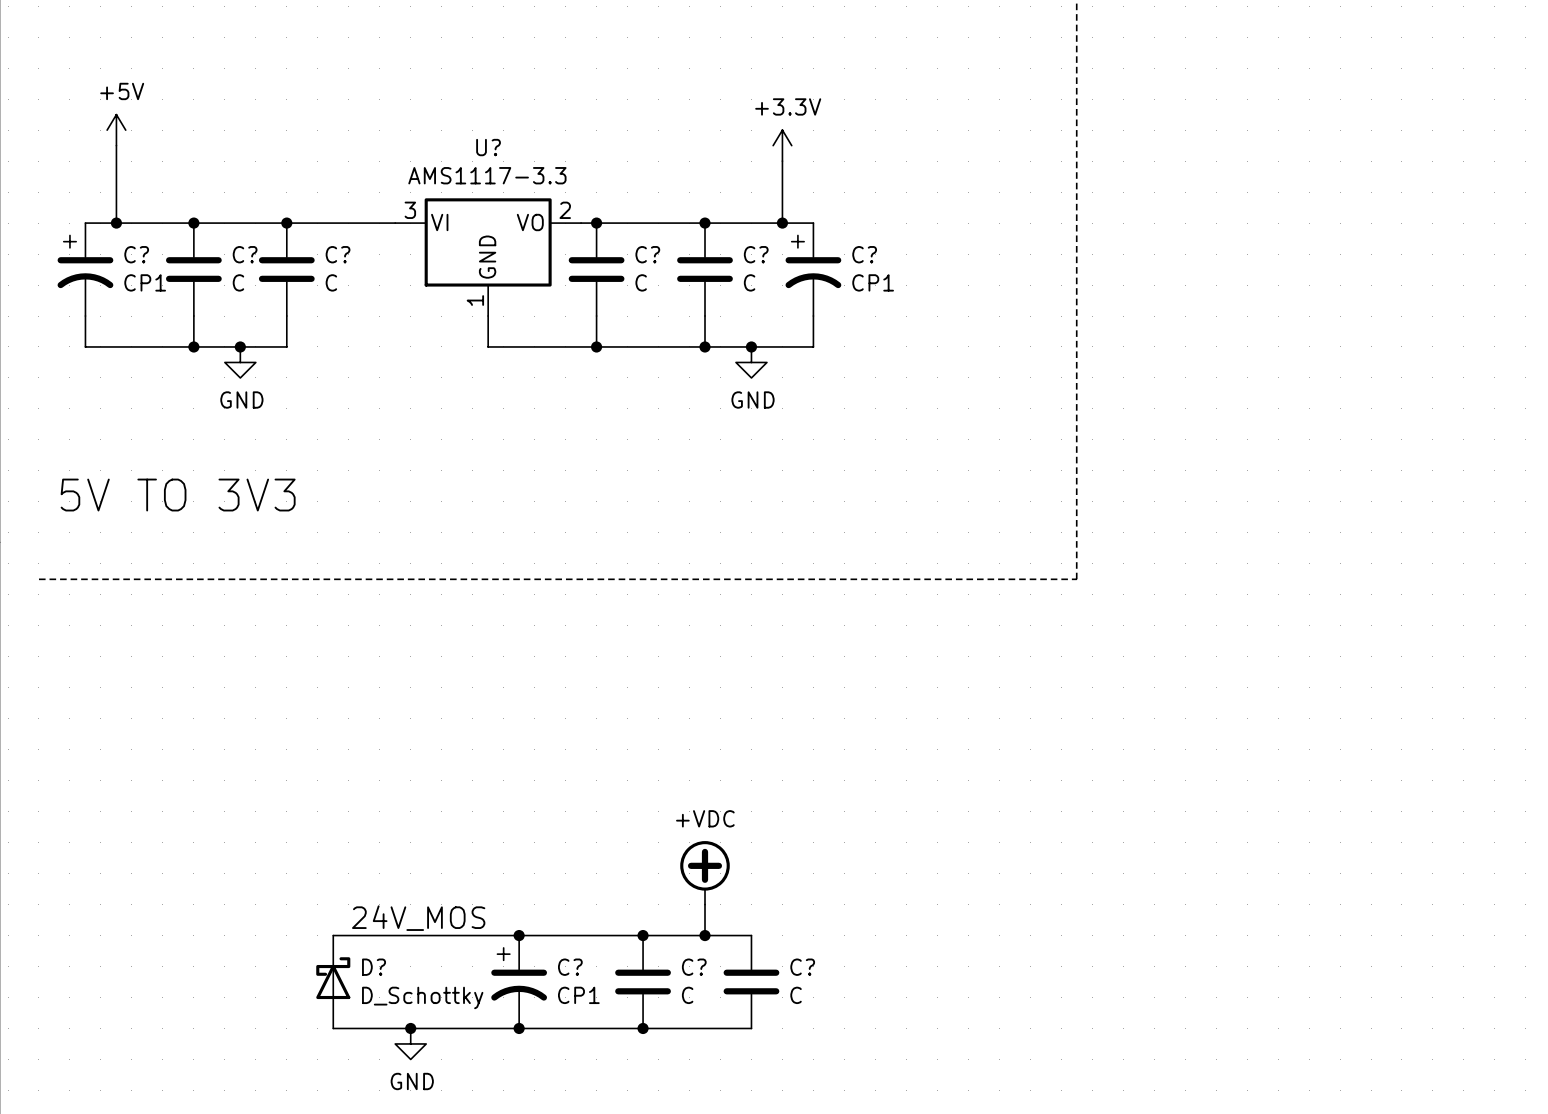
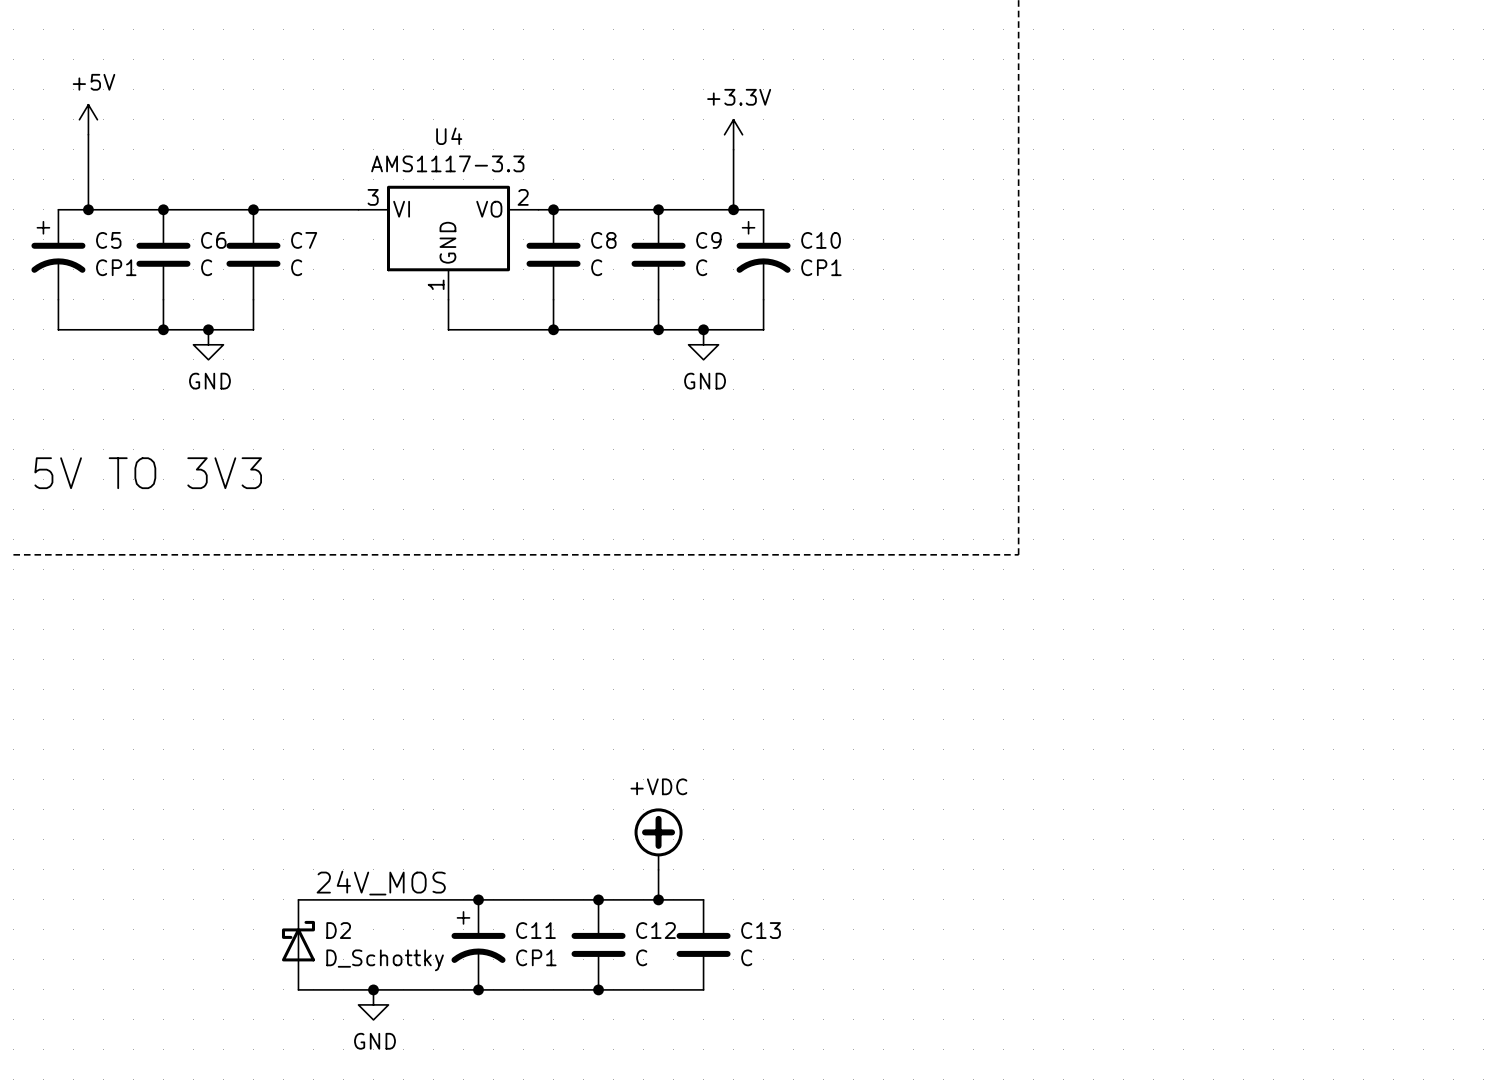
U? name: U? (488, 147) -> U4 (449, 136)
C? name: C? (136, 254) -> C5 (108, 240)
C? name: C? (245, 254) -> C6 (213, 240)
C? name: C? (338, 254) -> C7 (304, 240)
C? name: C? (647, 254) -> C8 (603, 240)
C? name: C? (756, 254) -> C9 (708, 240)
C? name: C? (864, 254) -> C10 (821, 240)
D? name: D? (374, 967) -> D2 (338, 930)
C? name: C? (570, 967) -> C11 (535, 930)
C? name: C? (694, 967) -> C12 (656, 930)
C? name: C? (802, 967) -> C13 (761, 930)

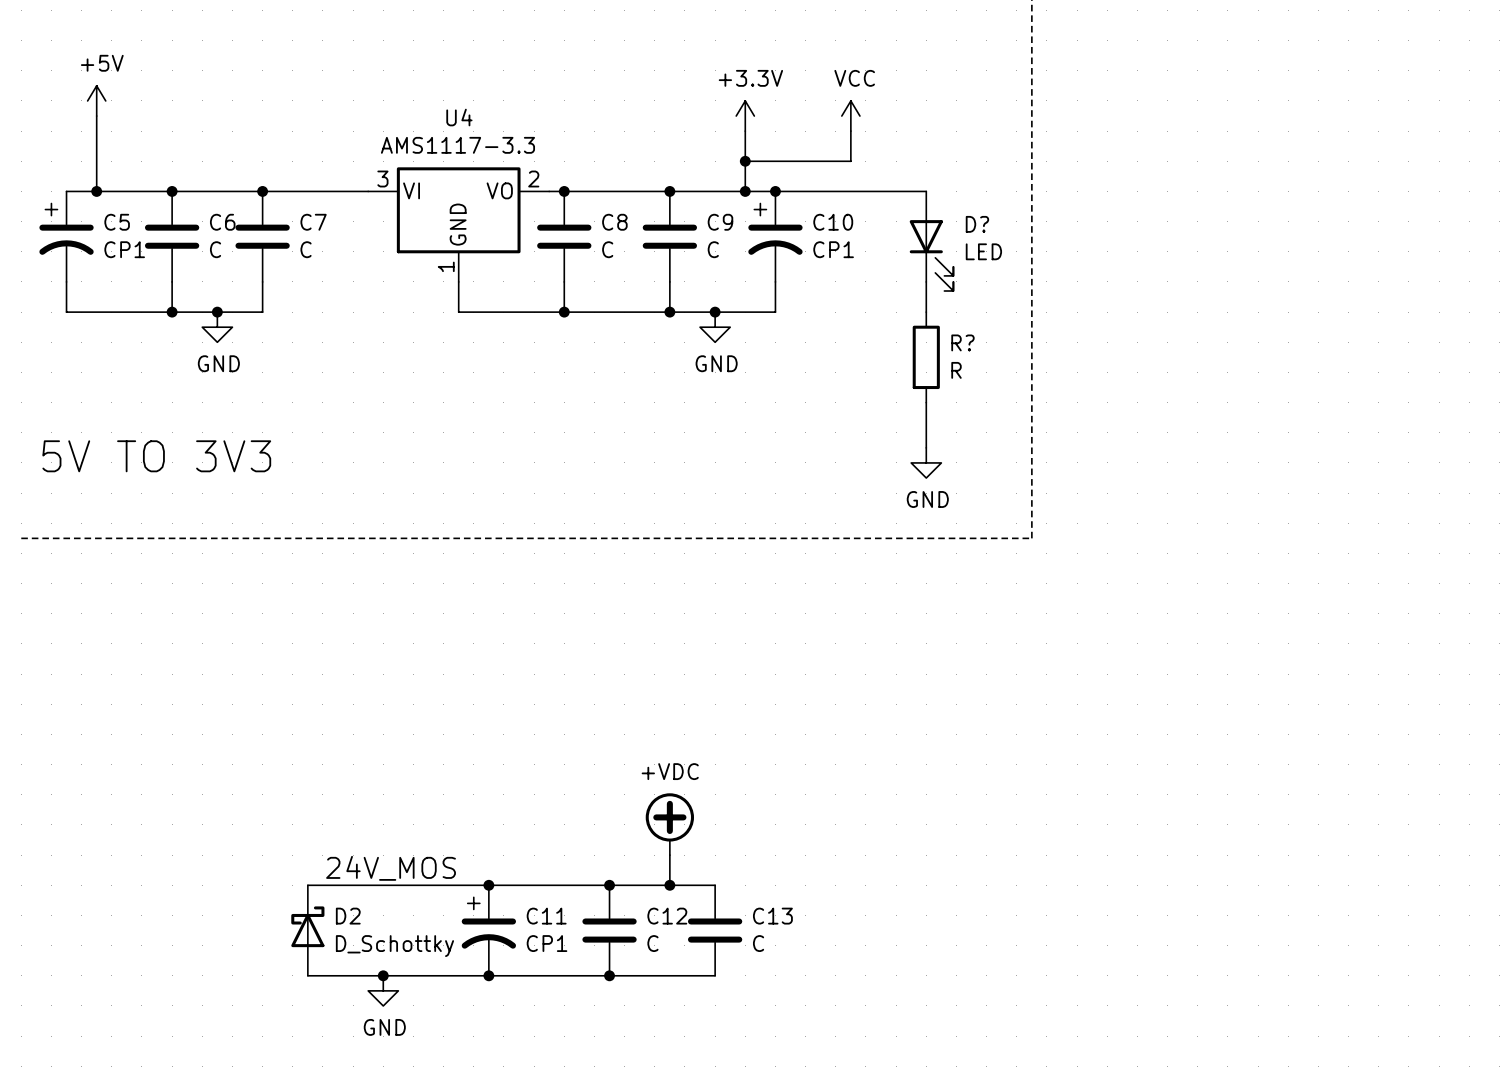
power symbol: none -> VCC (850, 116)
wire: none -> (850, 131) (850, 161) (745, 161)
junction: none -> (745, 161)
wire: none -> (775, 191) (926, 191)
junction: none -> (775, 191)
D?: none -> LED (931, 241)
wire: none -> (926, 281) (926, 312)
R?: none -> R (926, 357)
wire: none -> (926, 402) (926, 447)
power symbol: none -> GND (926, 462)

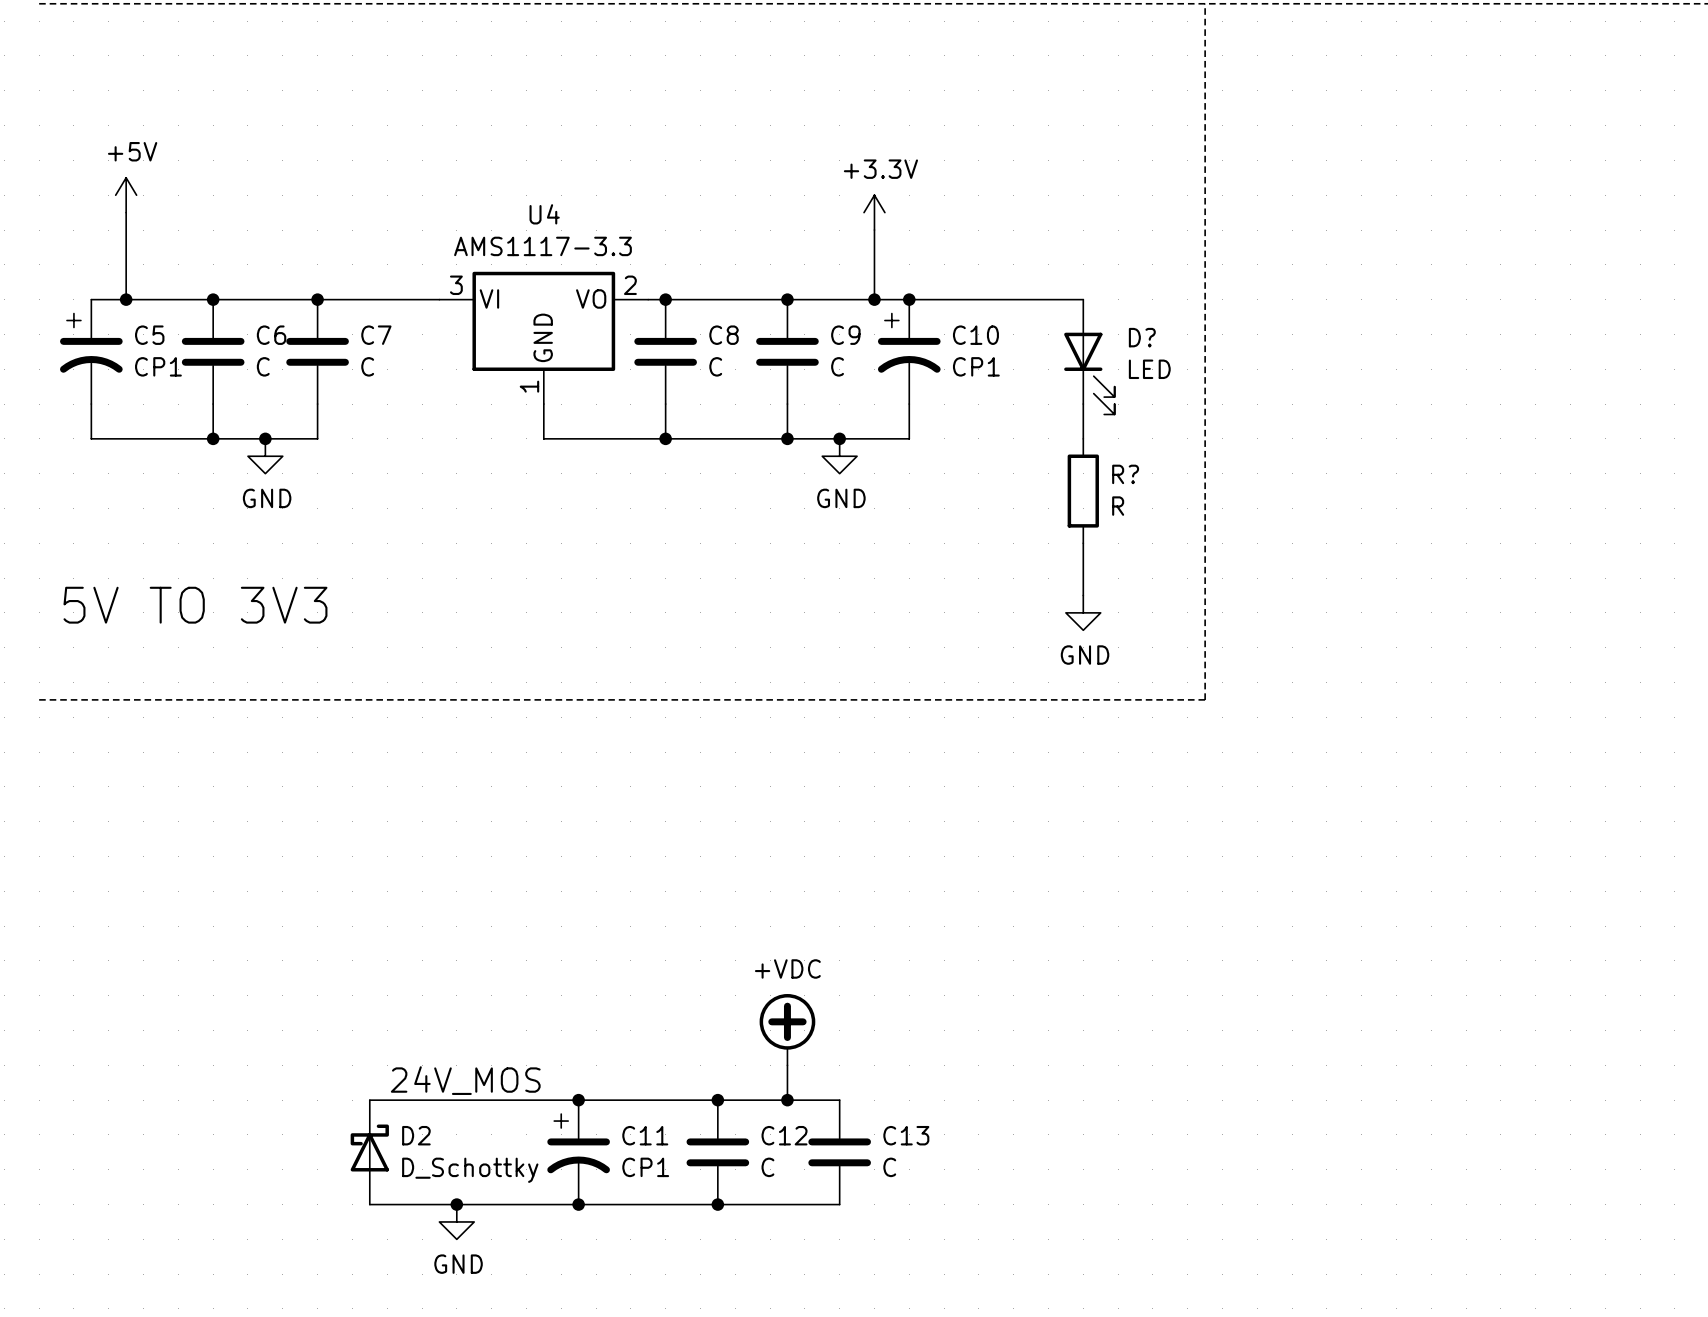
power symbol: VCC (850, 116) -> none
wire: (850, 131) (850, 161) (745, 161) -> none
junction: (745, 161) -> none

